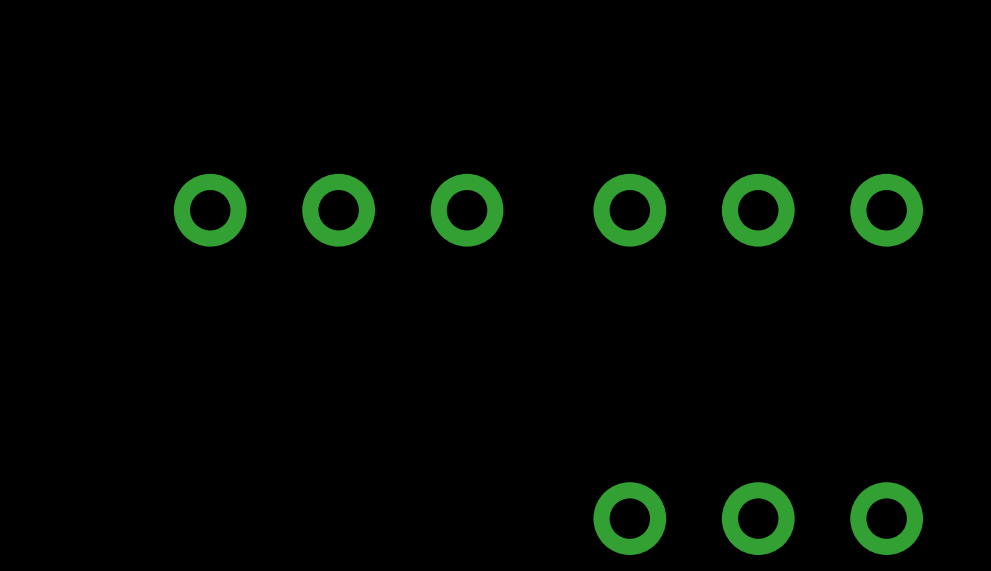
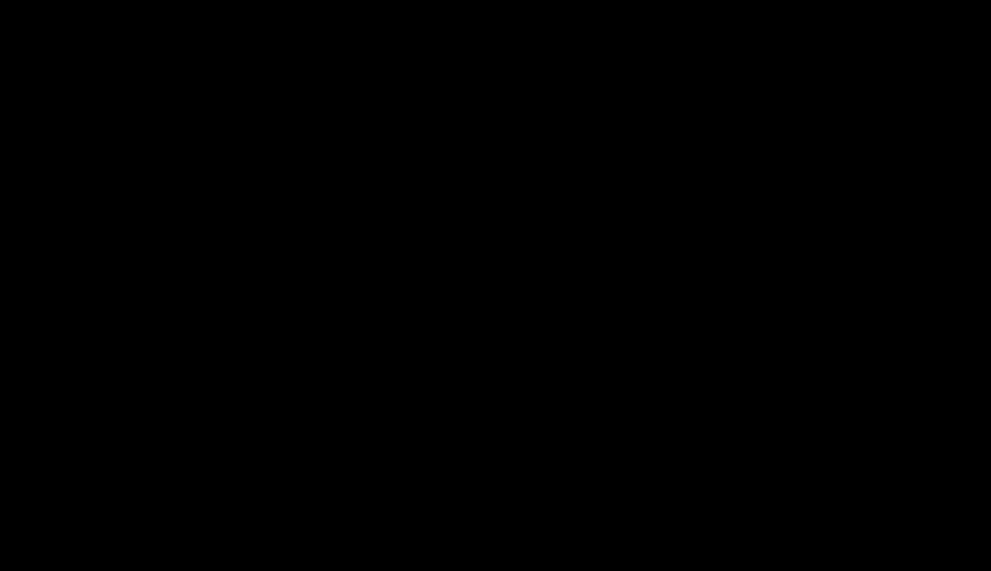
part: (338, 210) -> none
part: (758, 210) -> none
part: (758, 518) -> none

